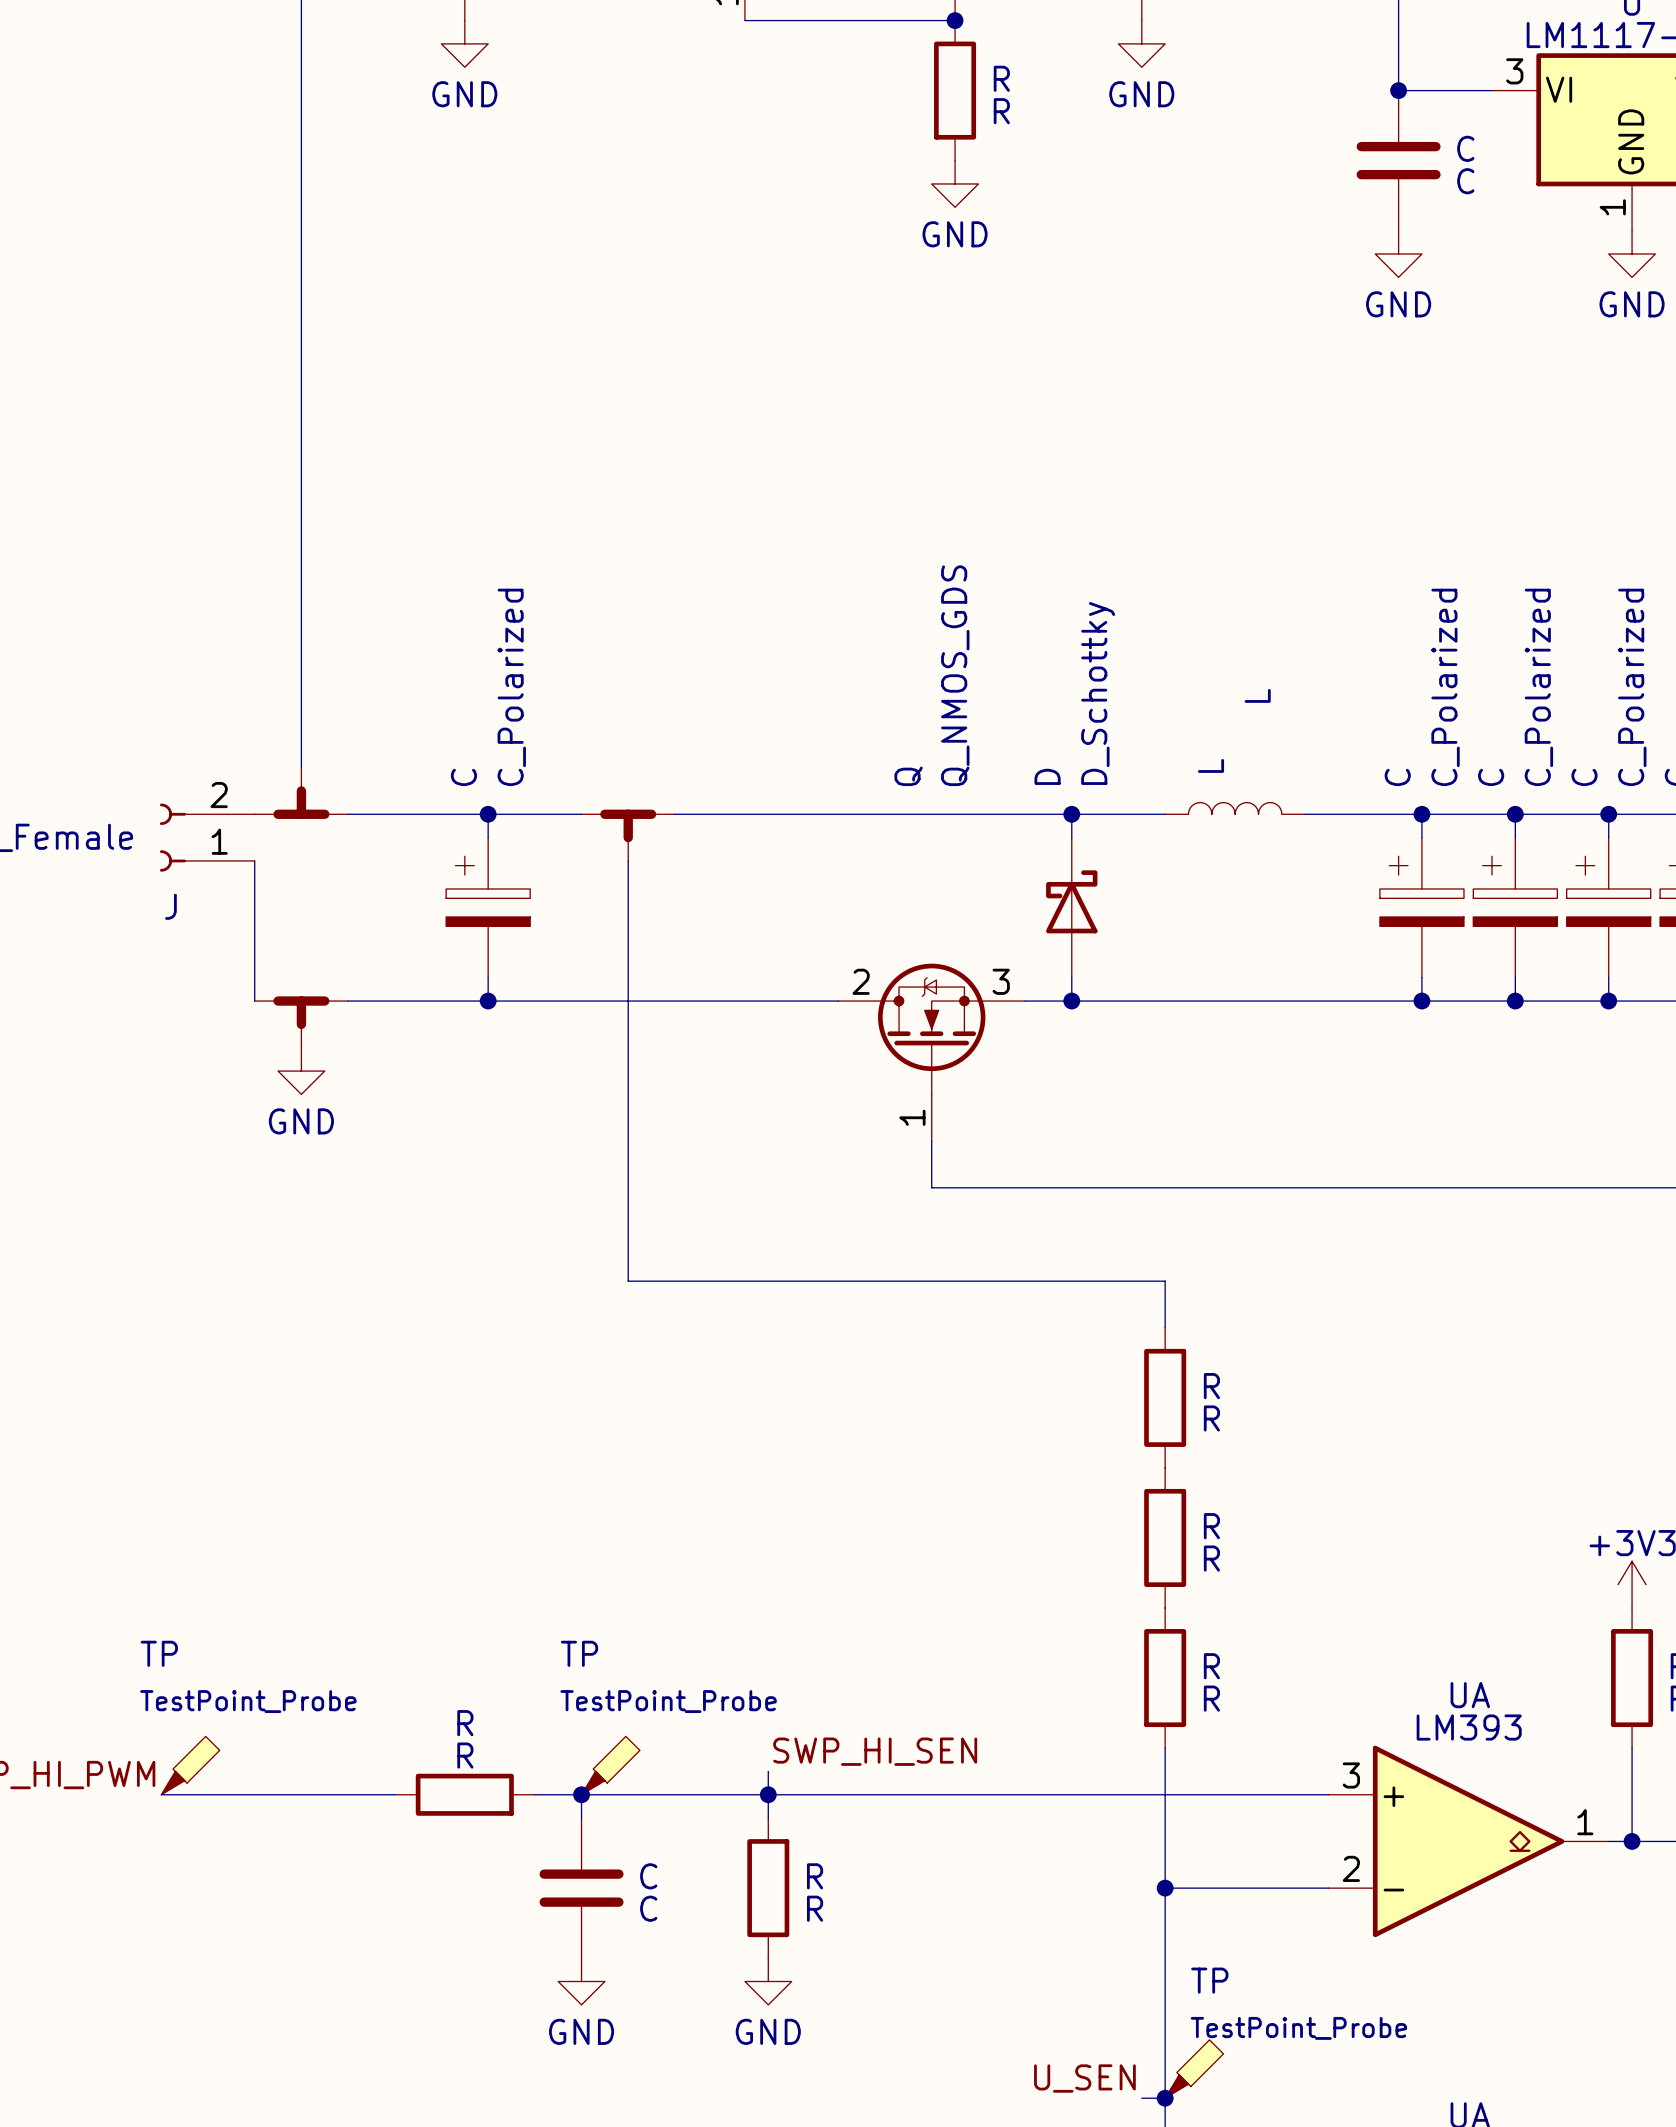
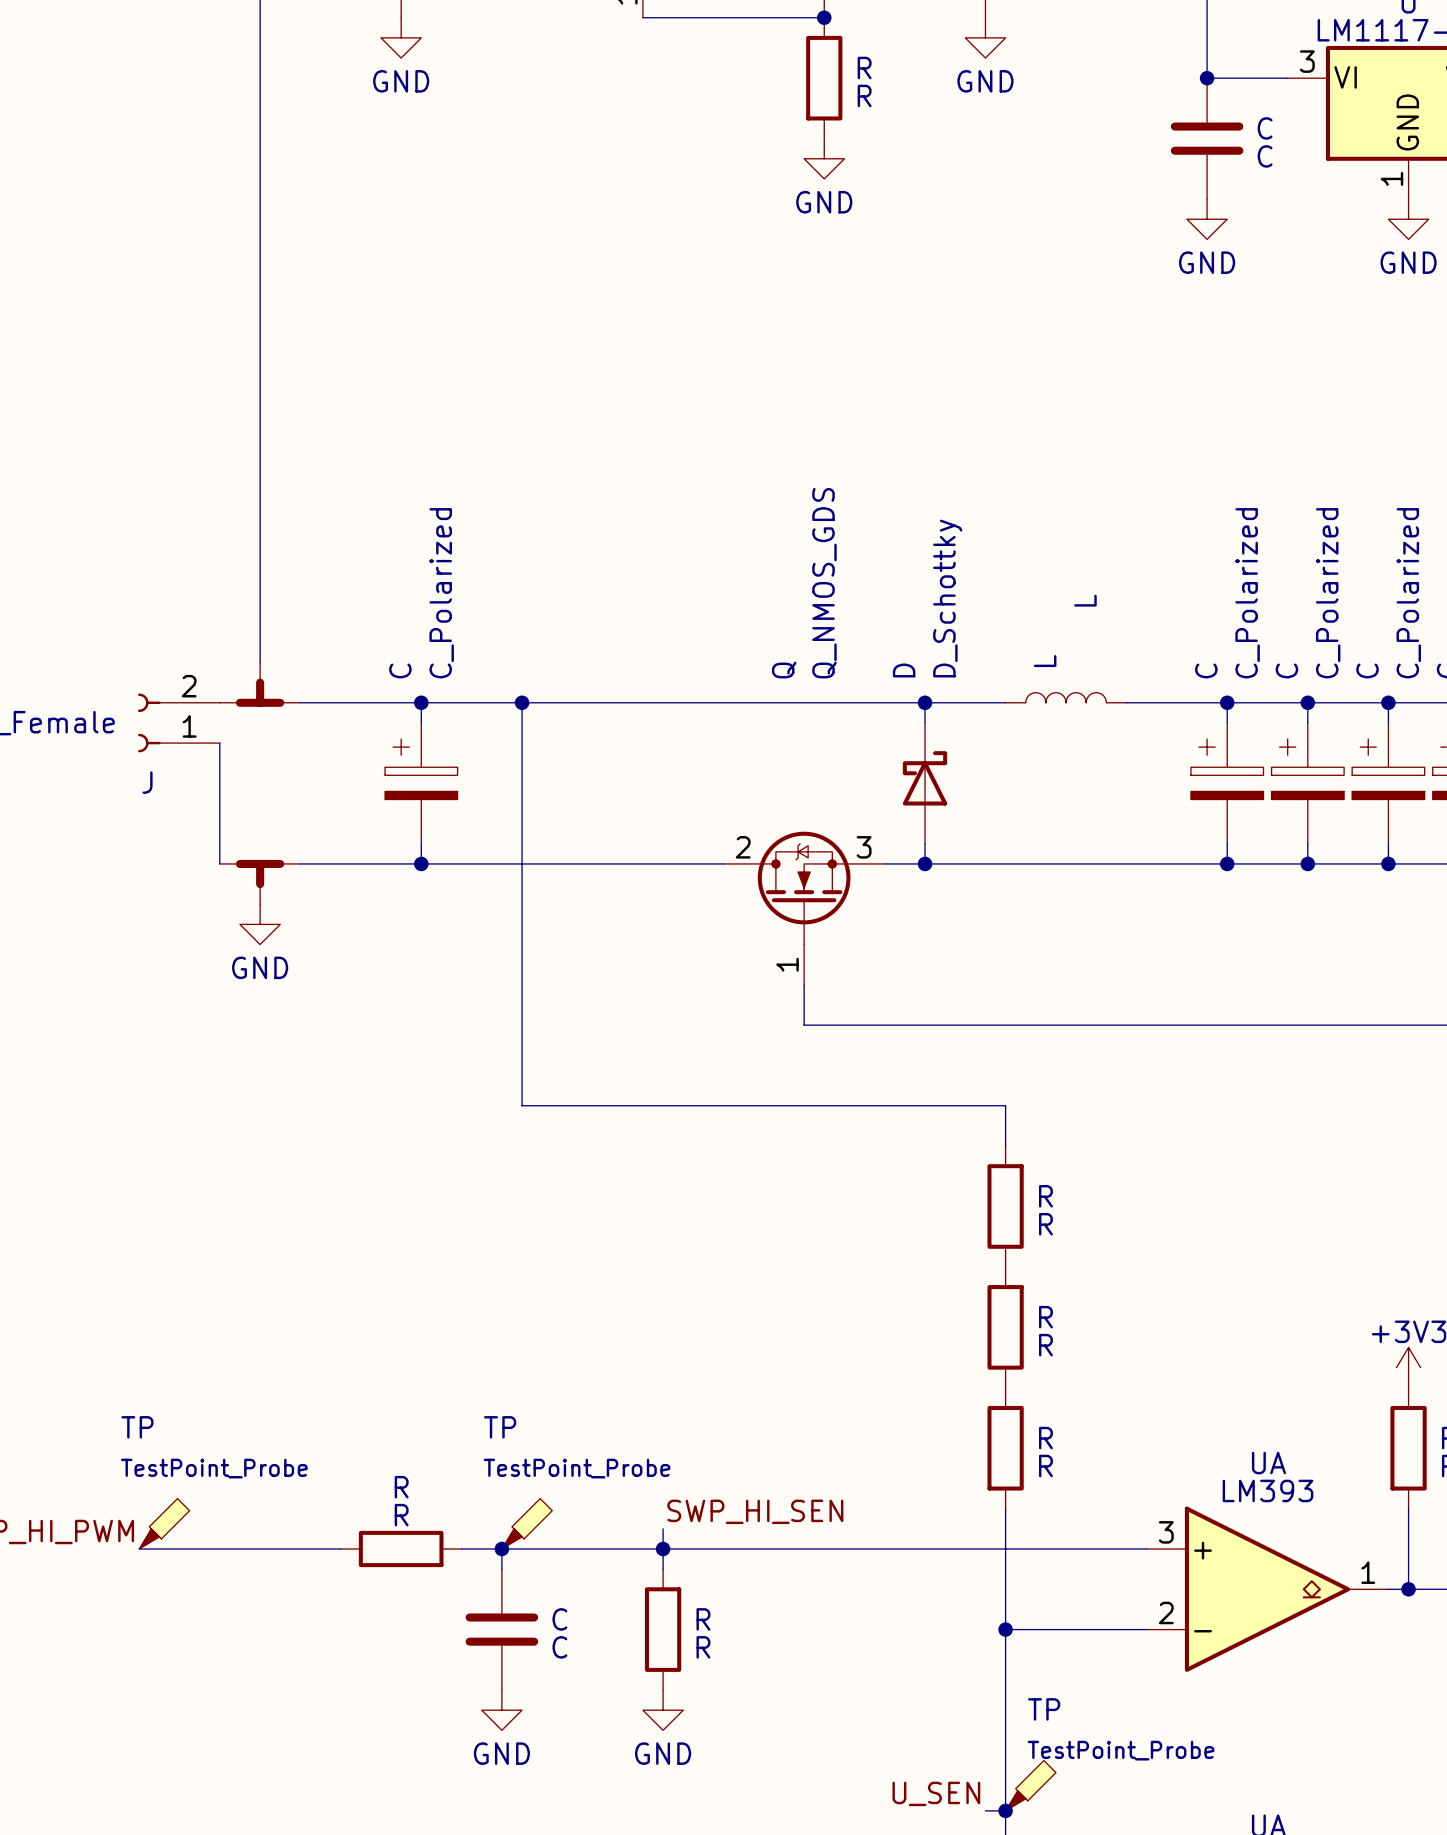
junction: none -> (522, 702)
part: (628, 836) -> none
wire: (628, 860) (628, 1281) -> (522, 702) (522, 1105) (542, 1105)

